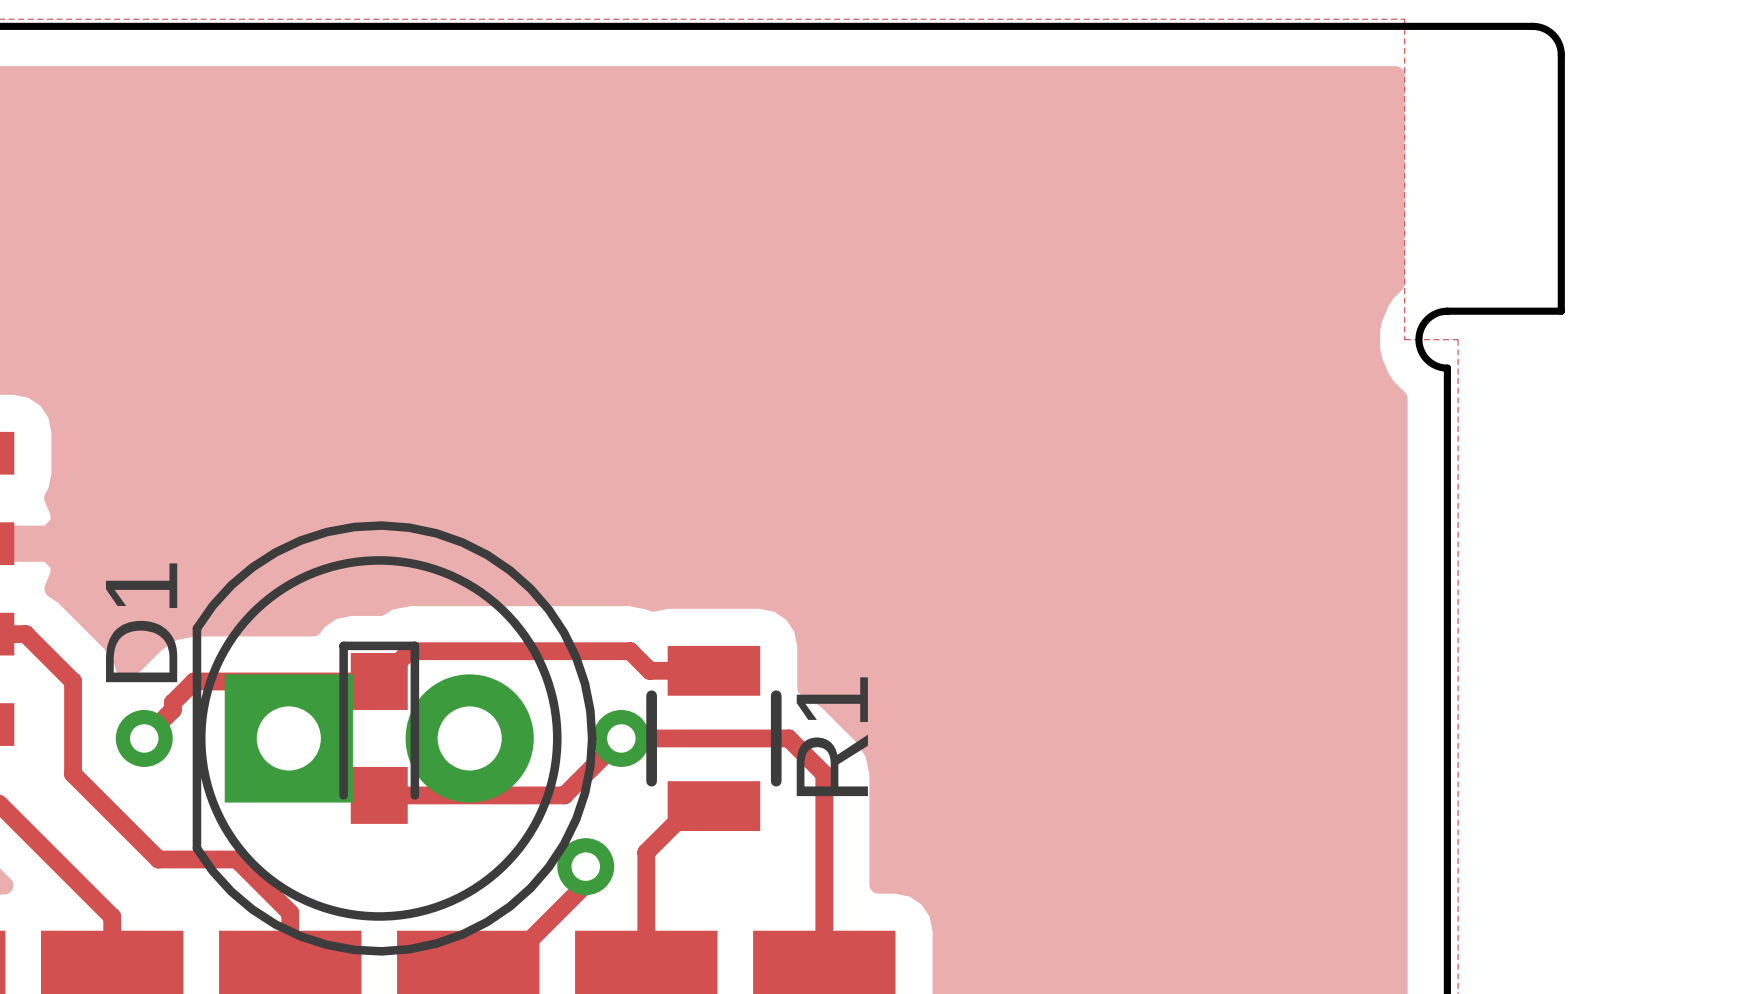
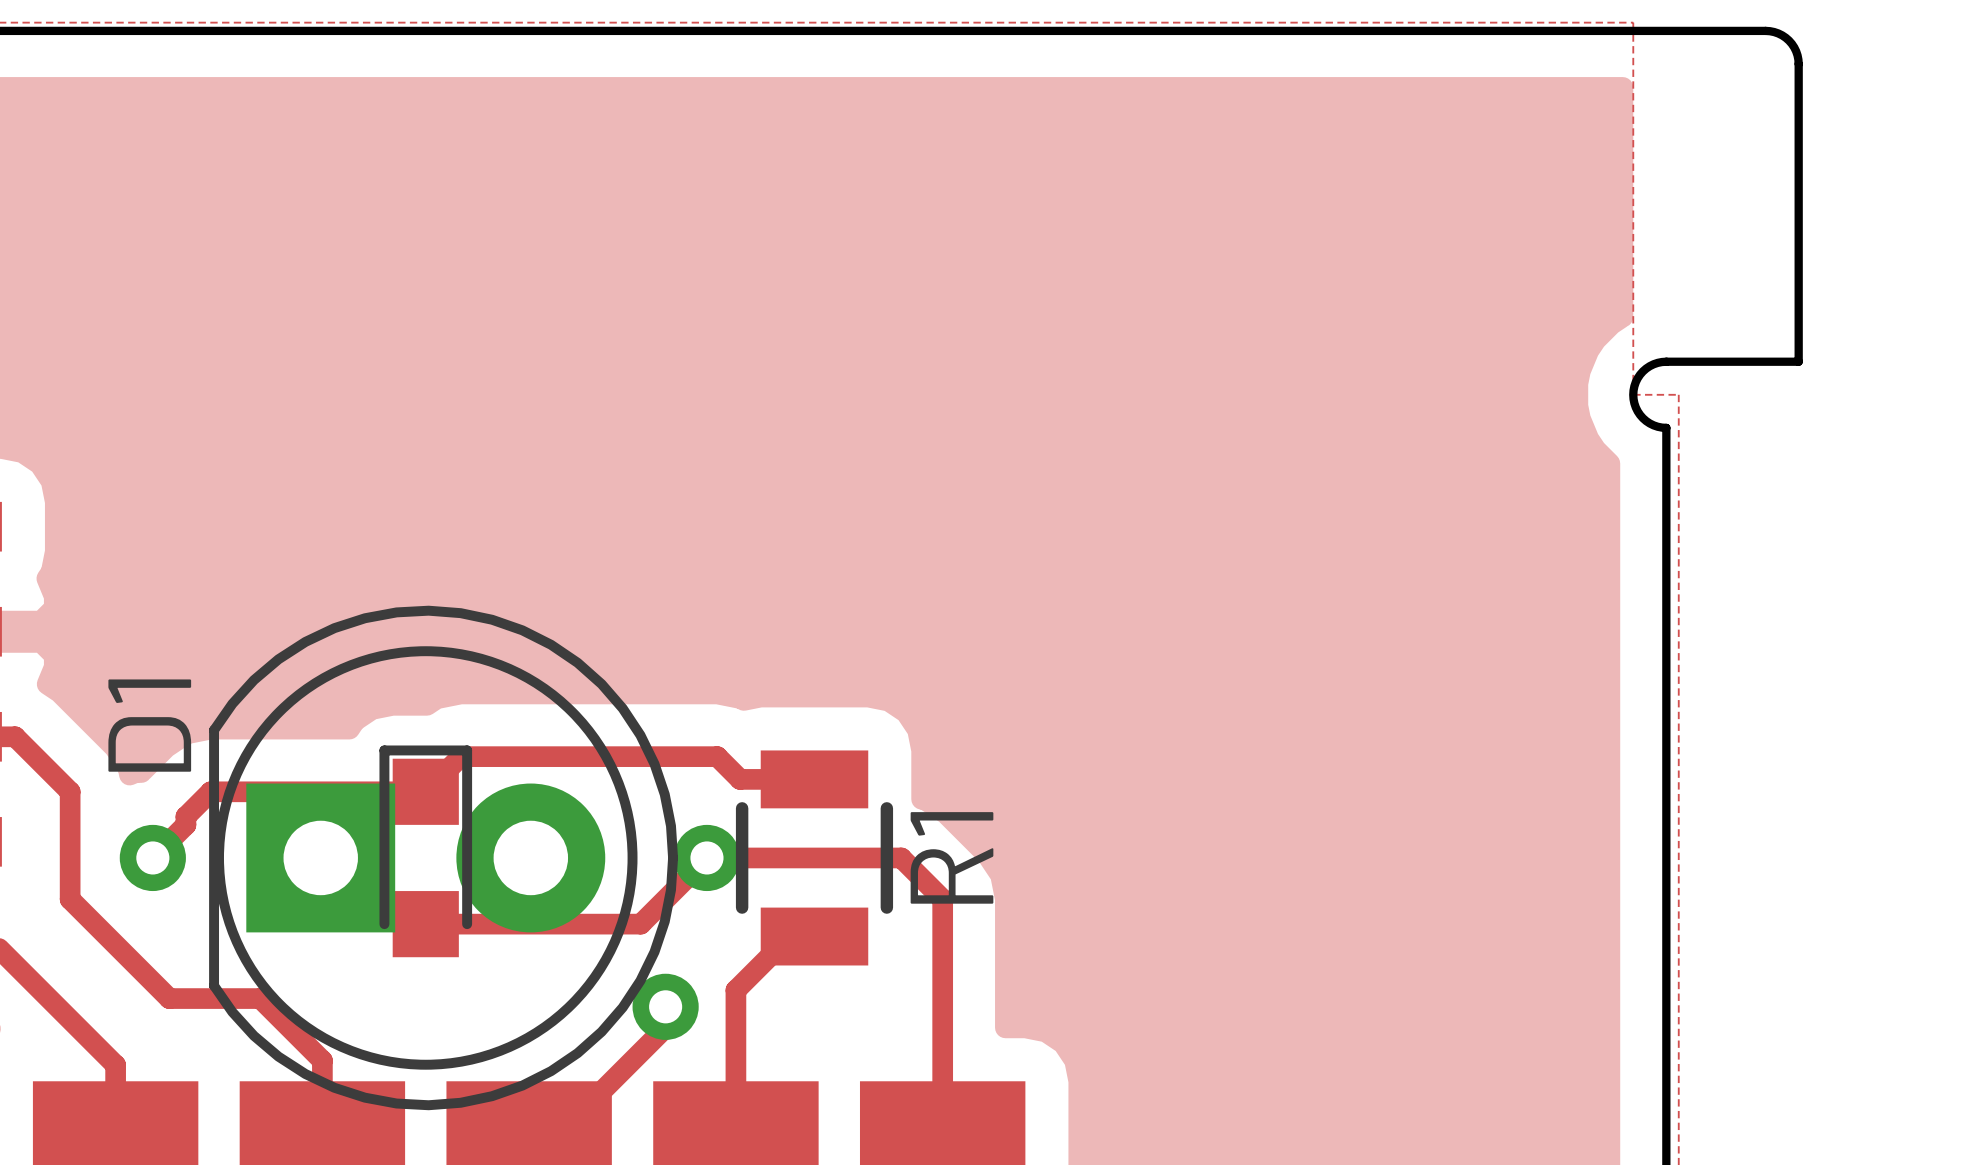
zone outline: (1404, 19) (1404, 339) (1418, 339) -> (1616, 22) (1633, 22) (1633, 394)

